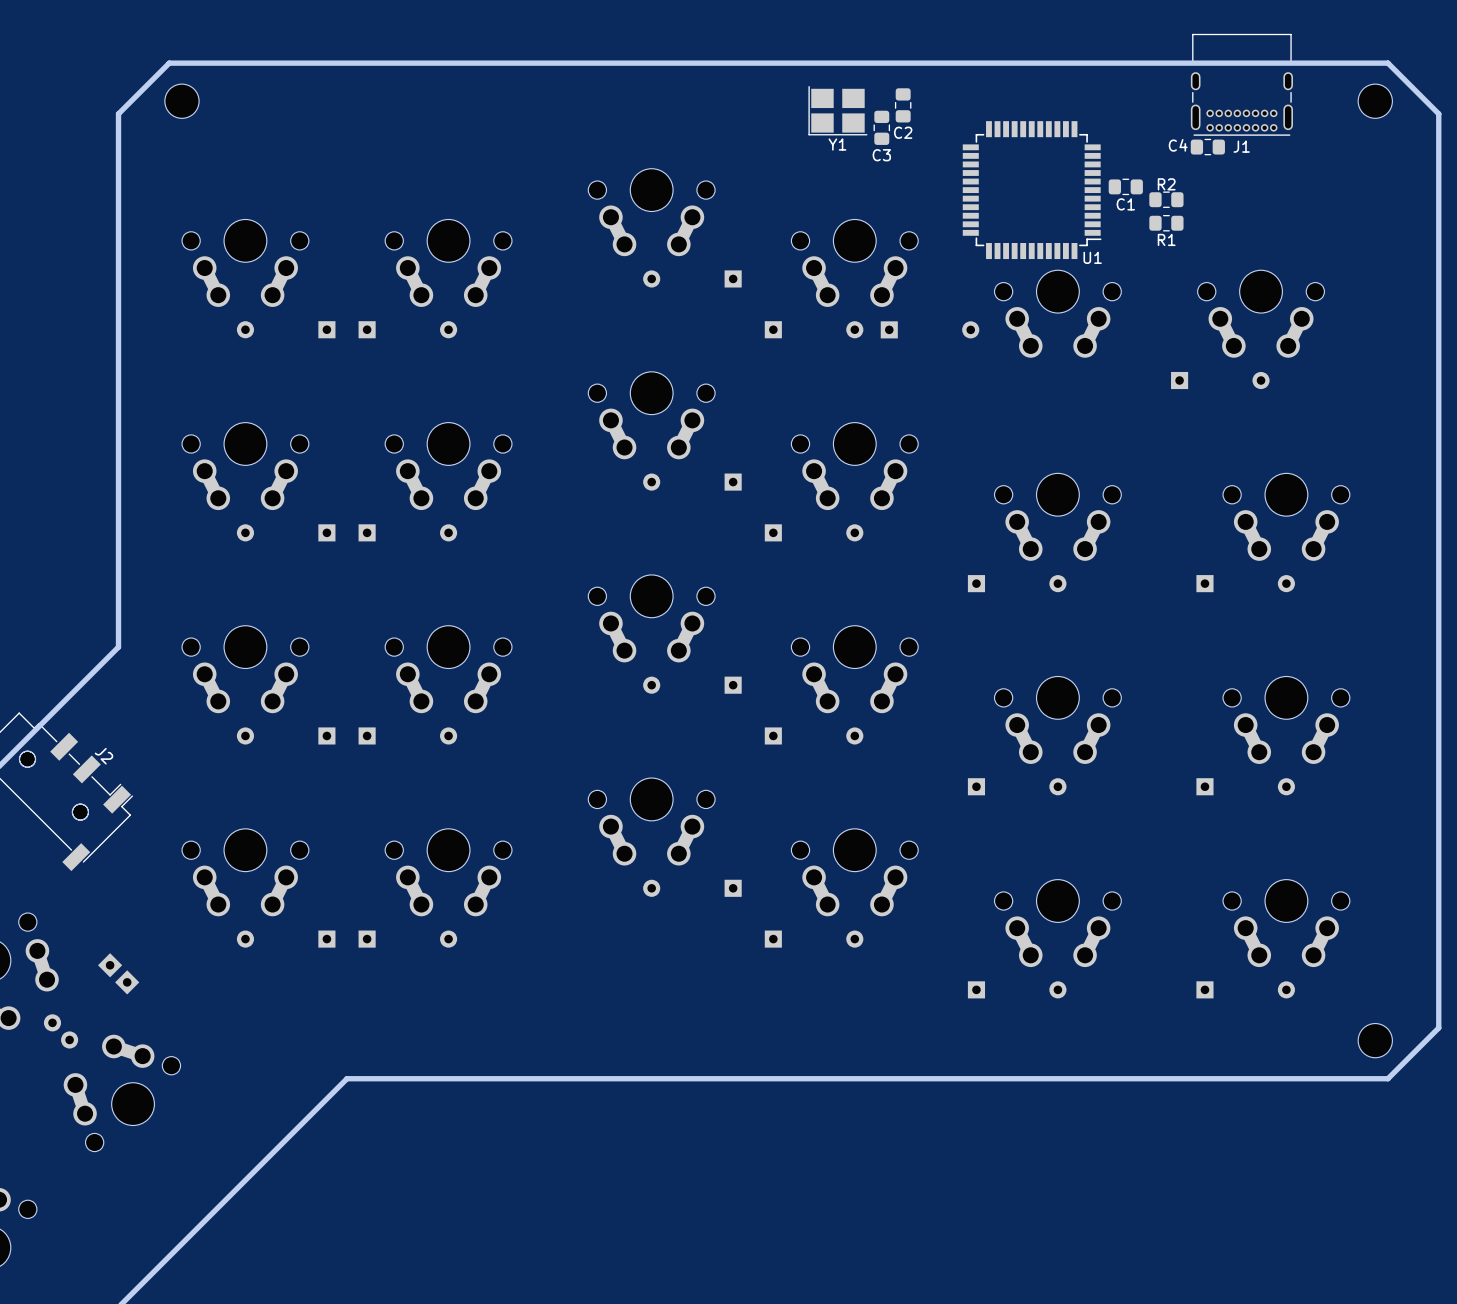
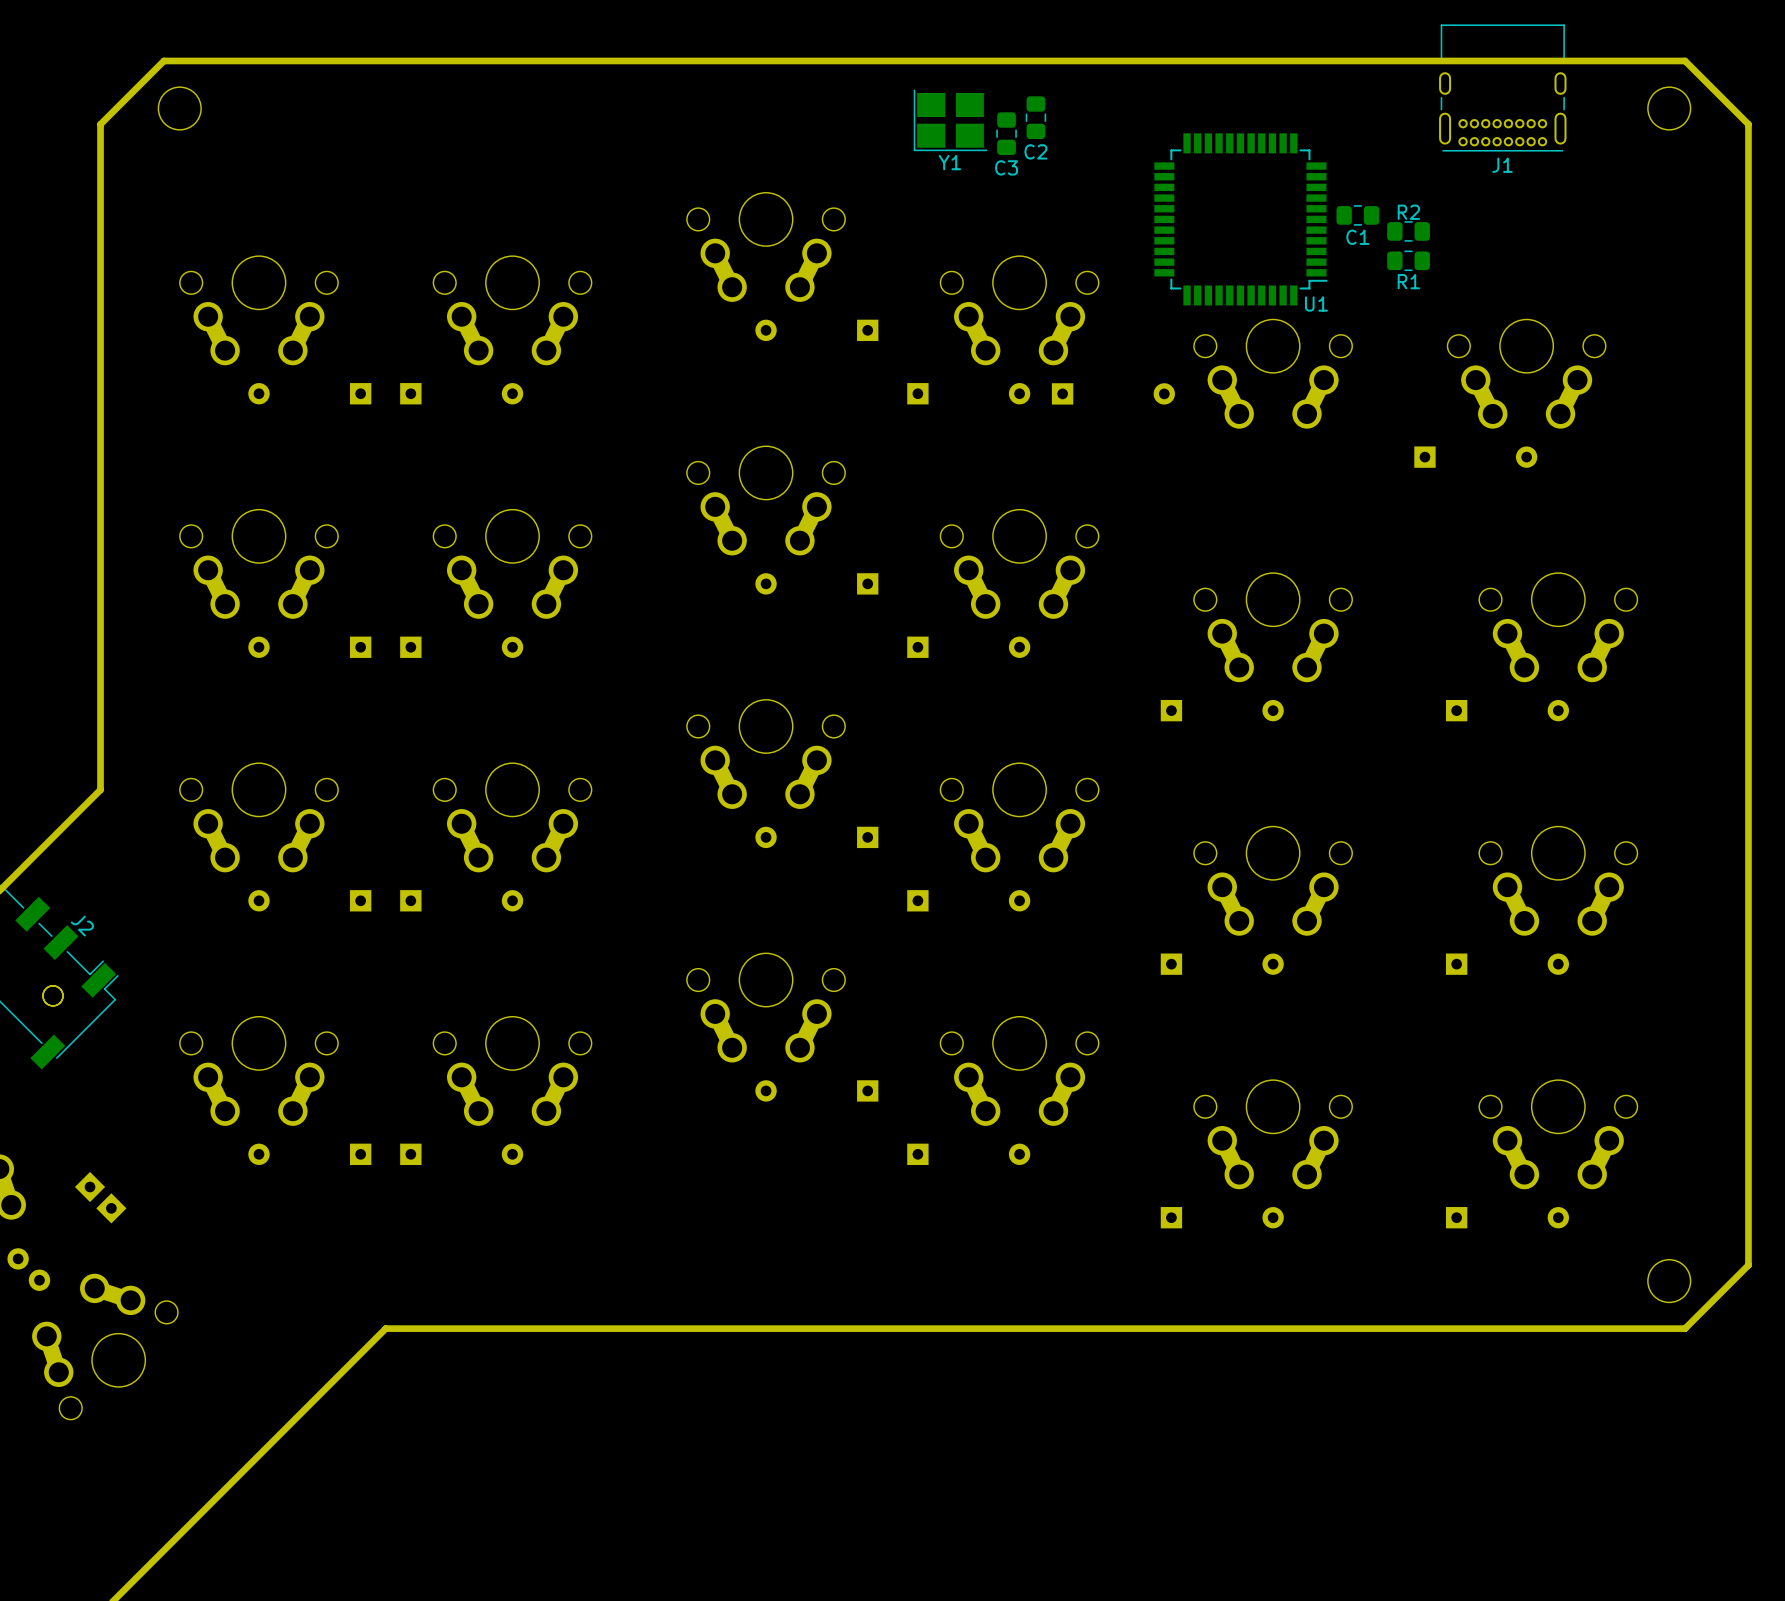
C2 position: (903, 105) -> (1035, 117)
Y1 position: (837, 110) -> (950, 120)
C3 position: (881, 127) -> (1006, 133)
C4: (1207, 147) -> none

